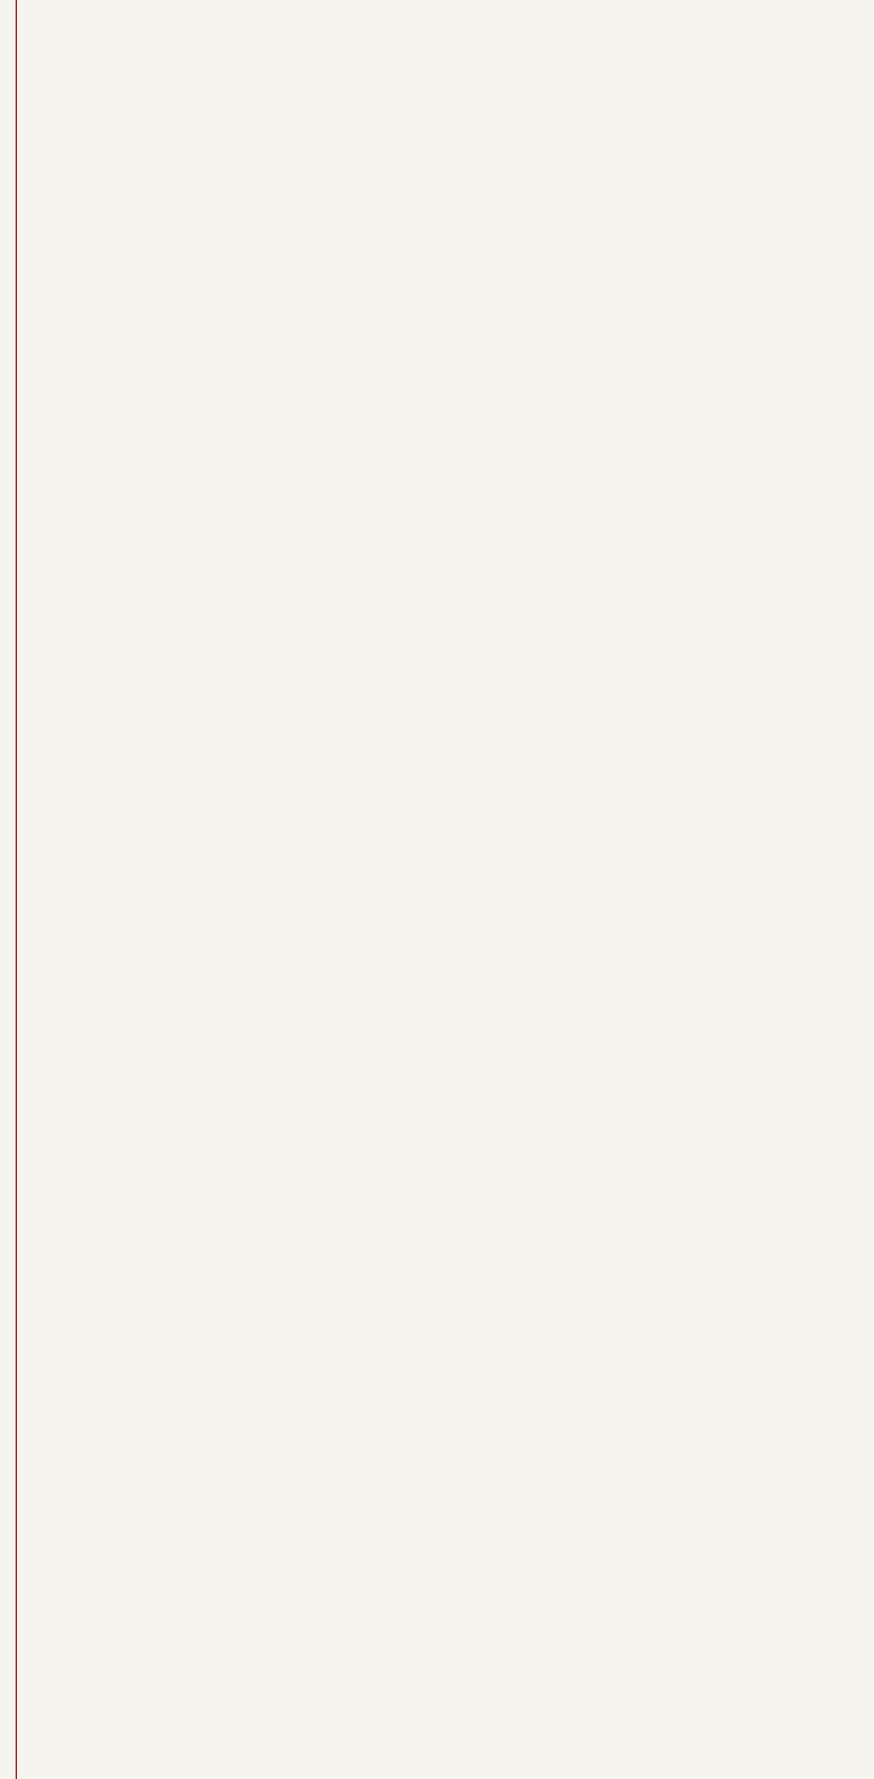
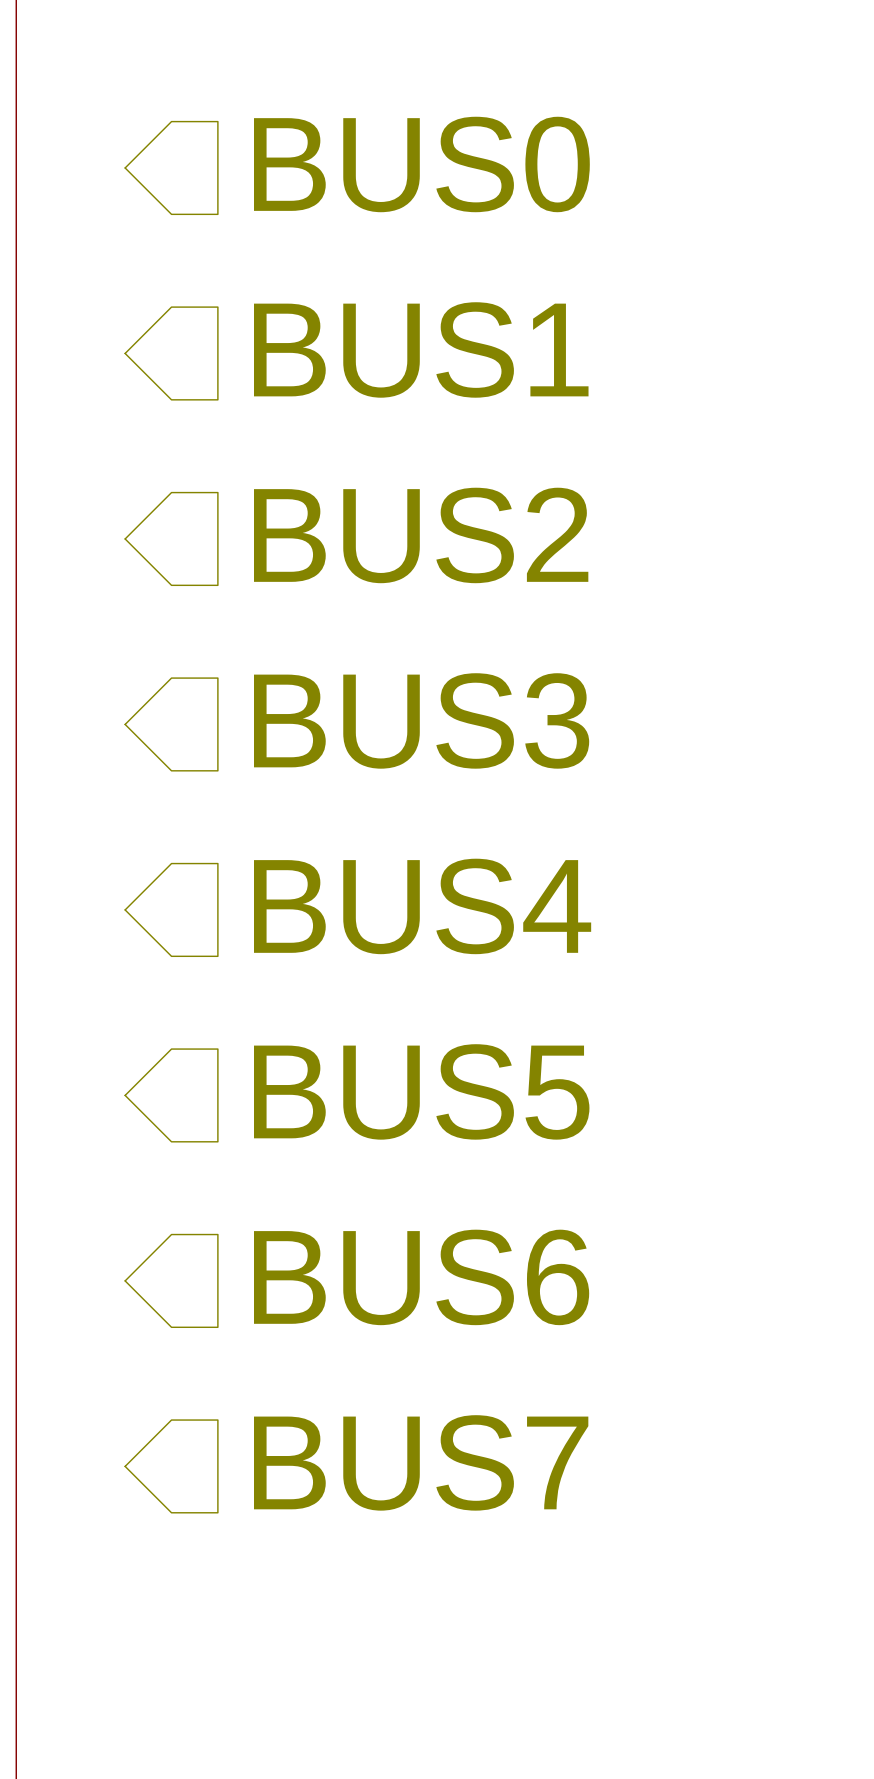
hierarchical label: none -> BUS0 (421, 164)
hierarchical label: none -> BUS1 (421, 349)
hierarchical label: none -> BUS2 (421, 535)
hierarchical label: none -> BUS3 (421, 720)
hierarchical label: none -> BUS4 (422, 906)
hierarchical label: none -> BUS5 (421, 1091)
hierarchical label: none -> BUS6 (421, 1277)
hierarchical label: none -> BUS7 (421, 1462)

